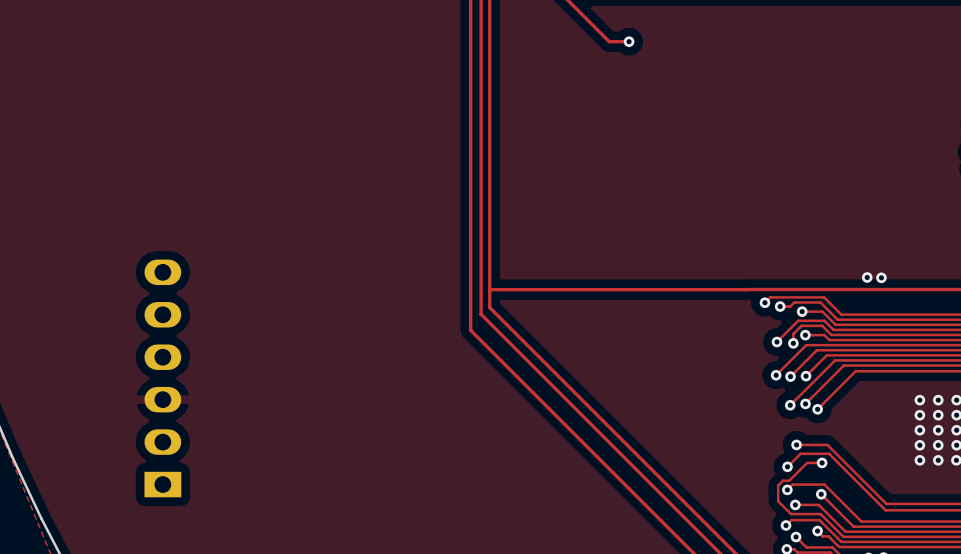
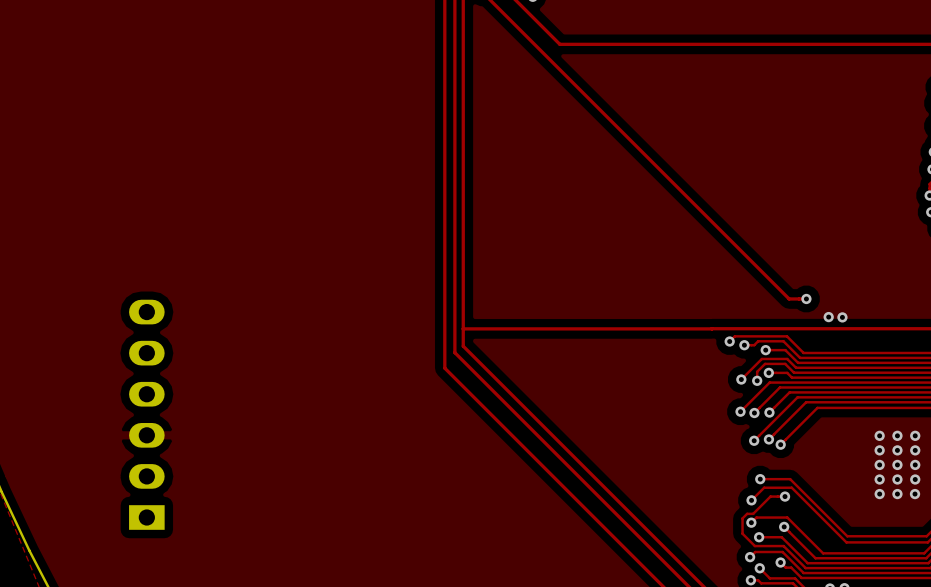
track: (609, 41) (629, 41) -> (578, 88) (789, 298) (806, 298)
via: (629, 41) -> none
via: none -> (806, 298)

